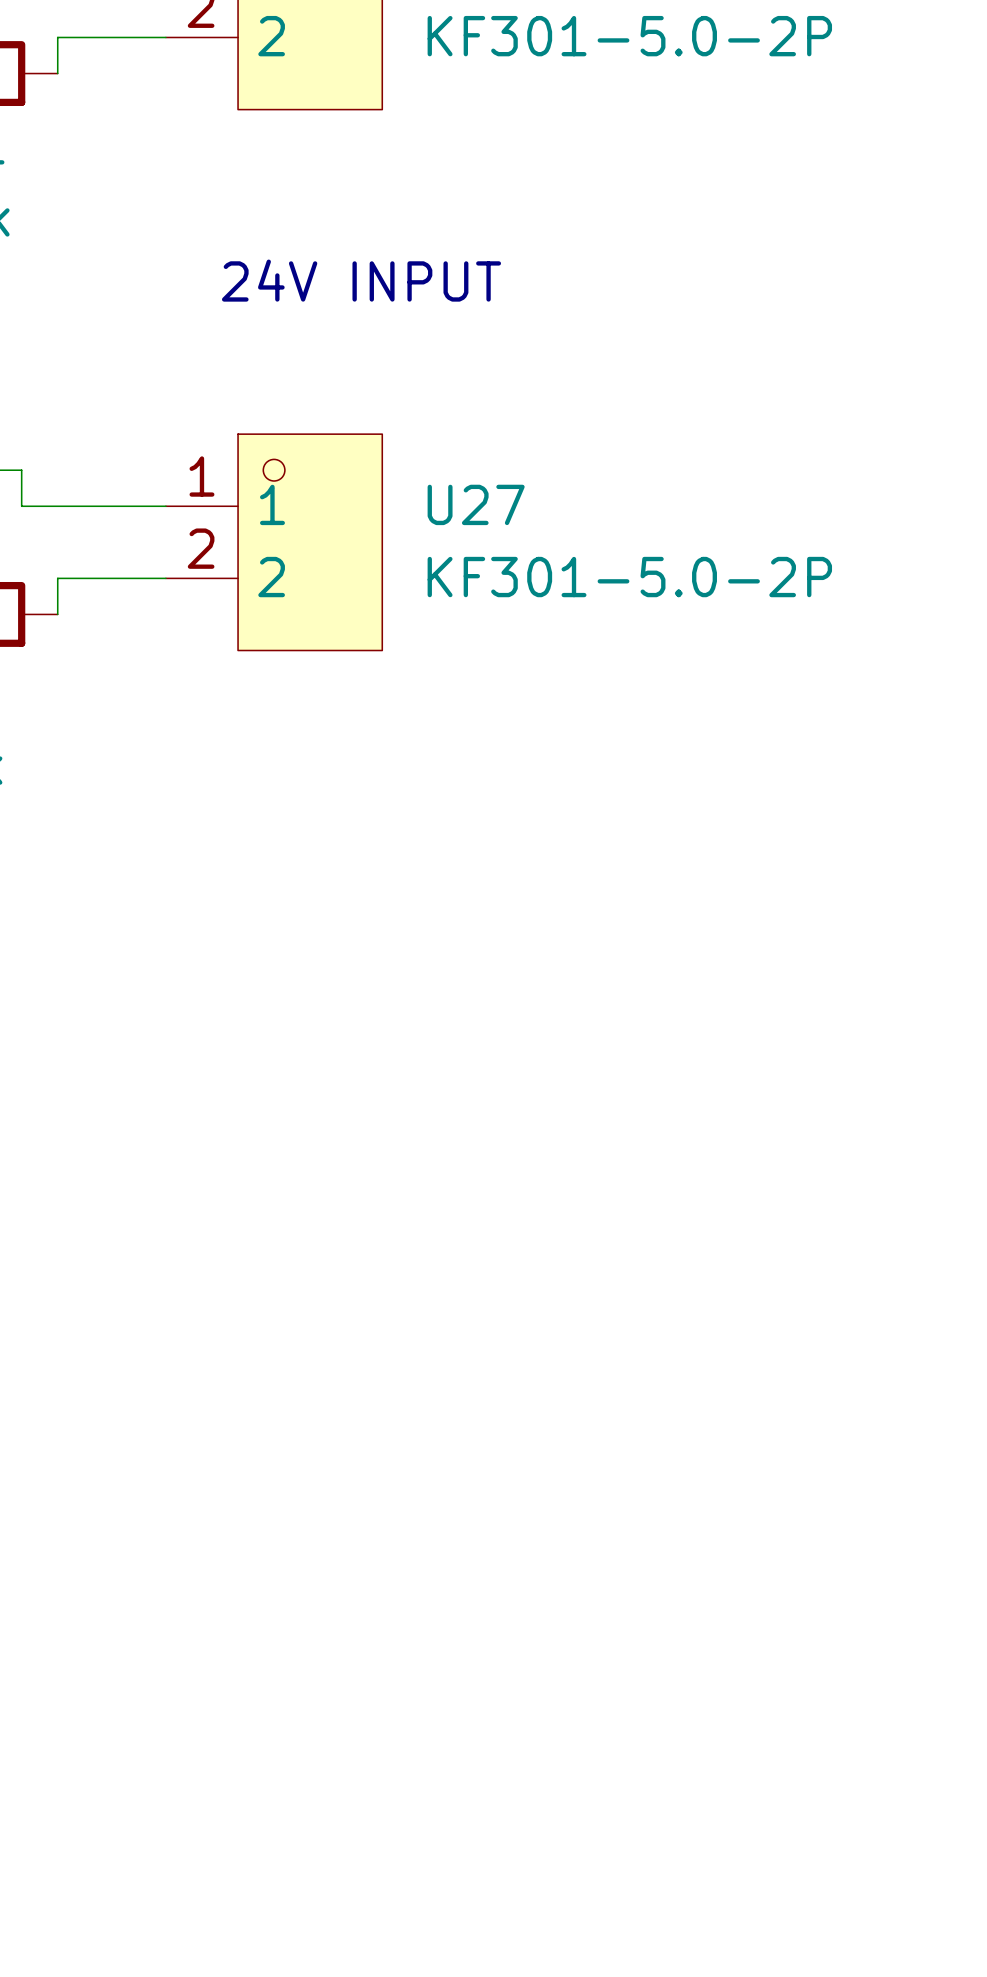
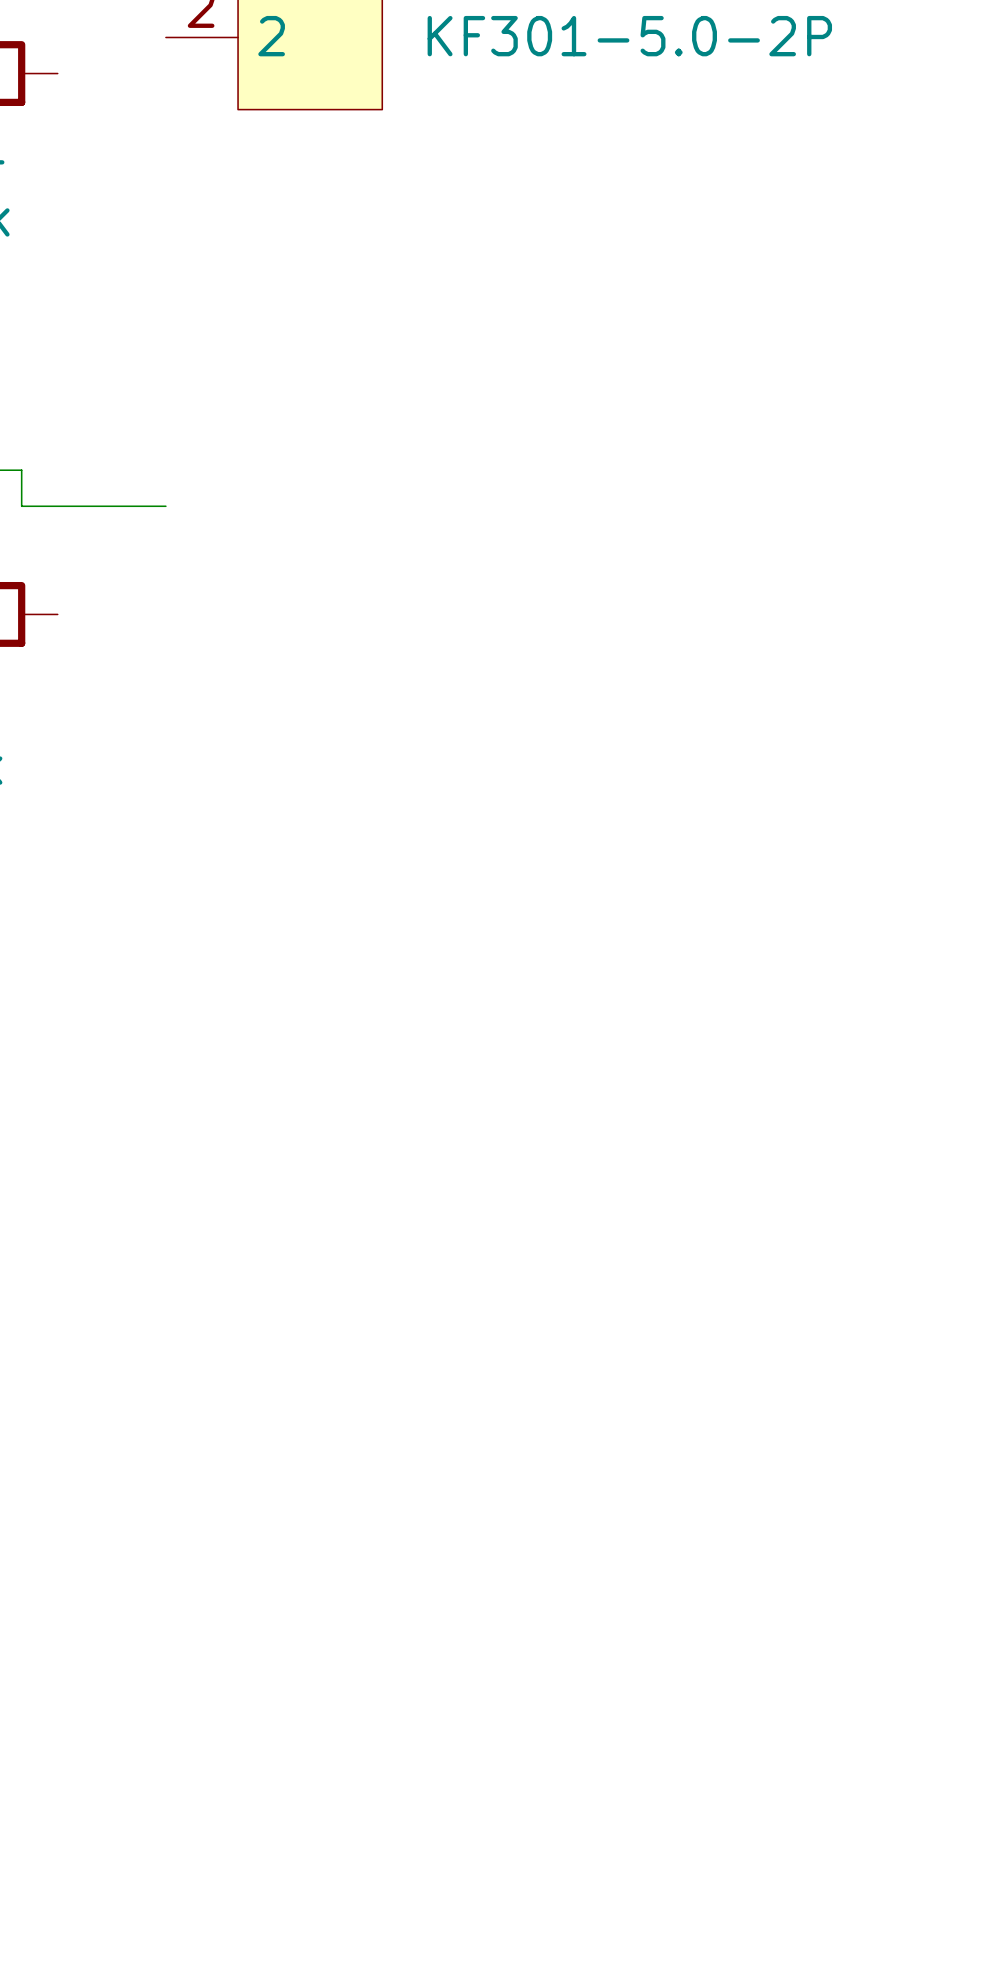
wire: (165, 37) (57, 37) (57, 73) -> none
text: 24V INPUT (361, 280) -> none
U27: KF301-5.0-2P (274, 542) -> none
wire: (165, 578) (57, 578) (57, 614) -> none

